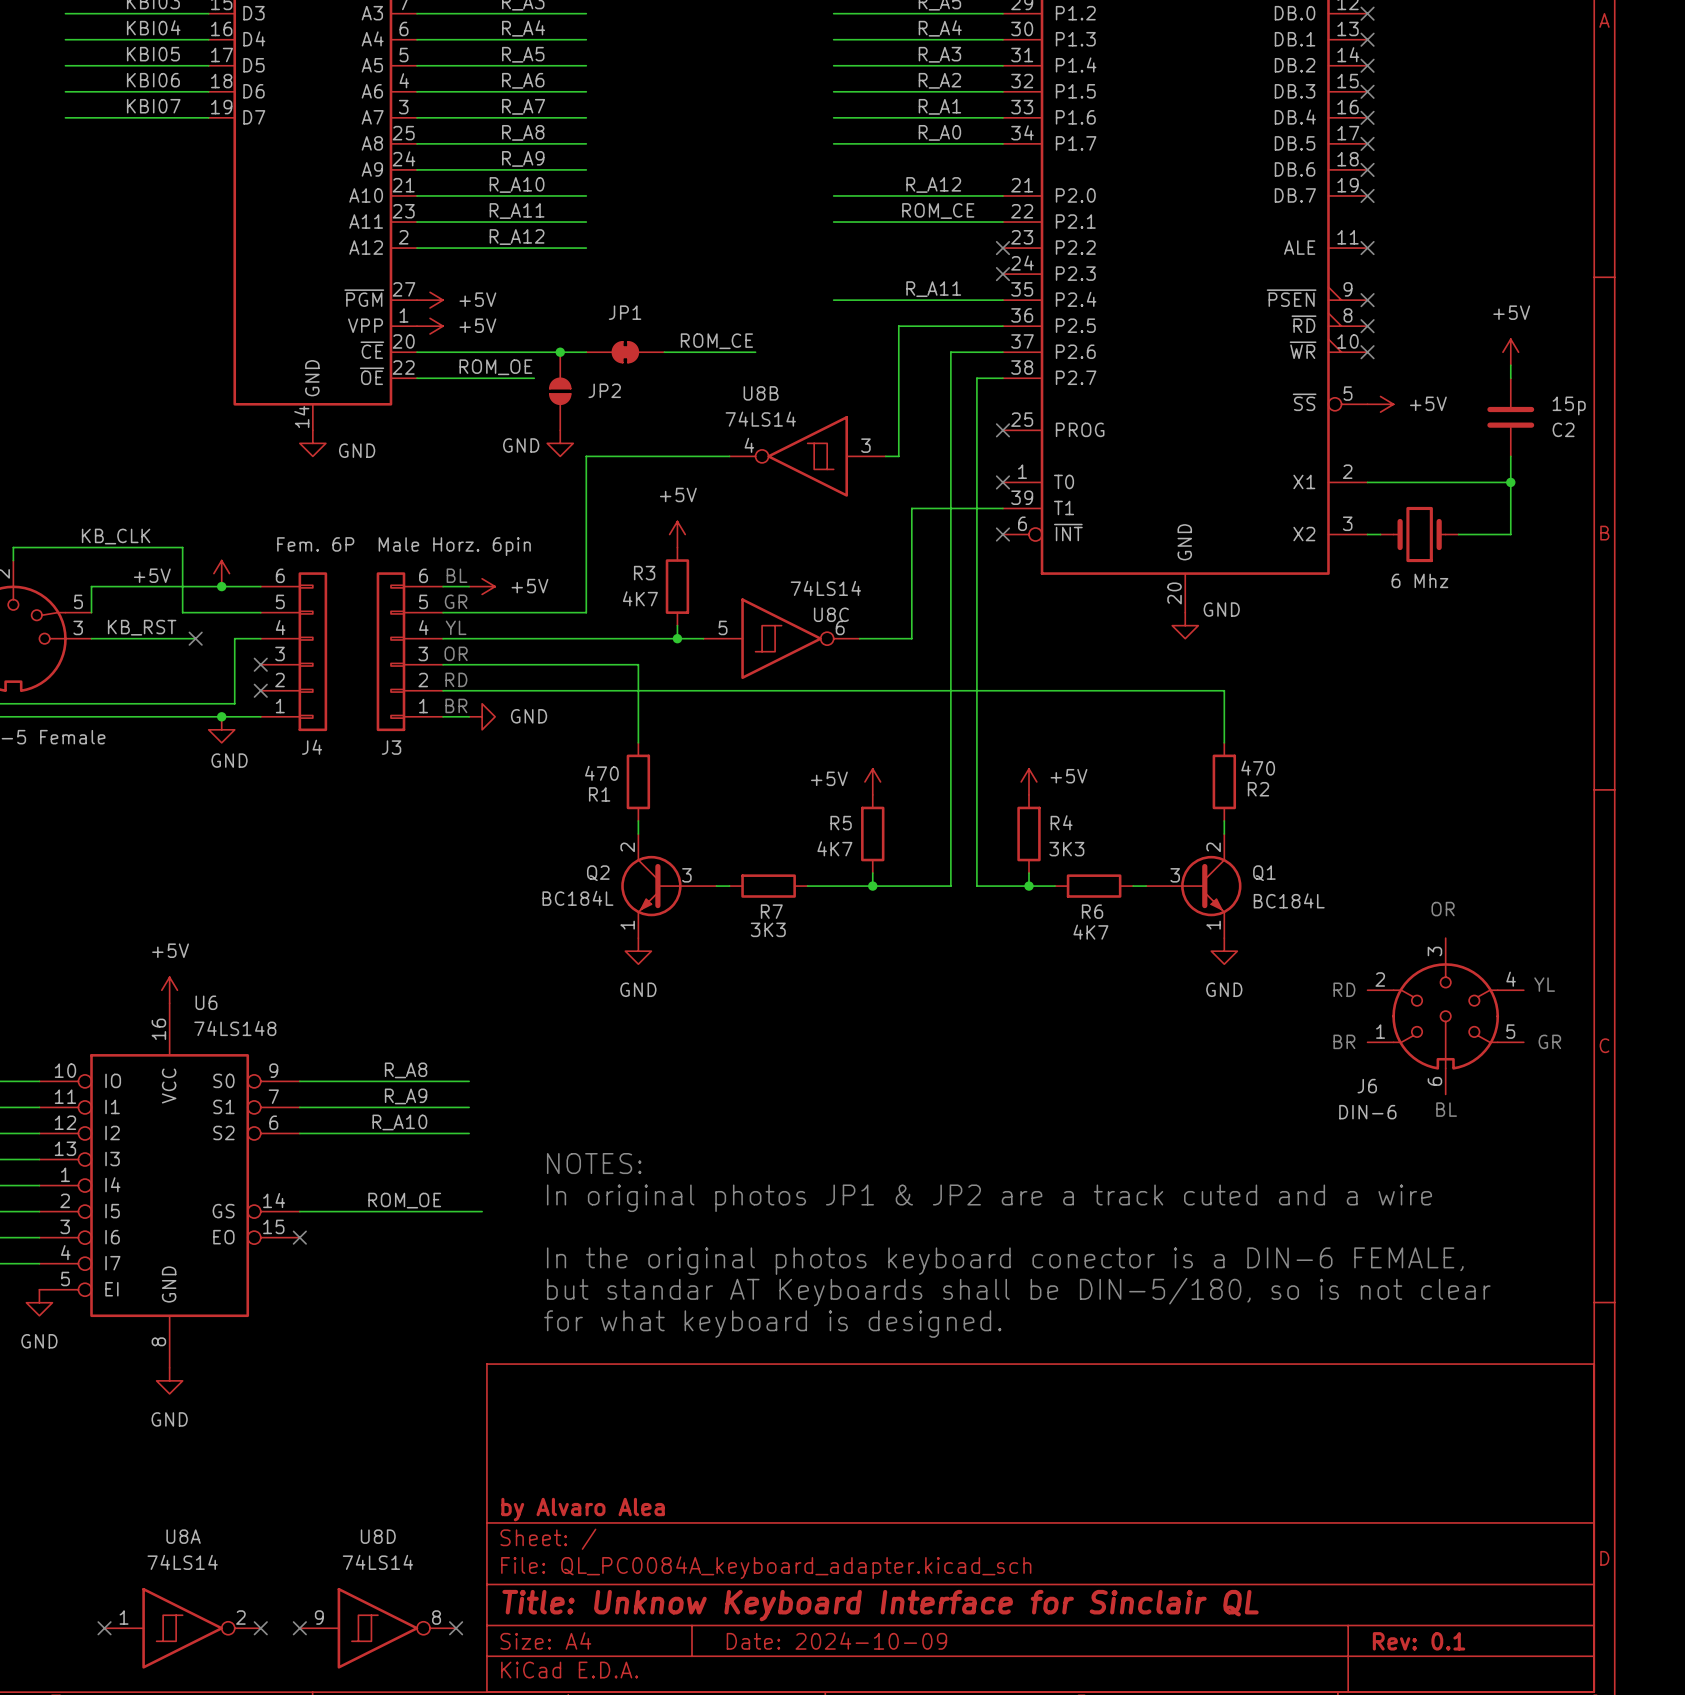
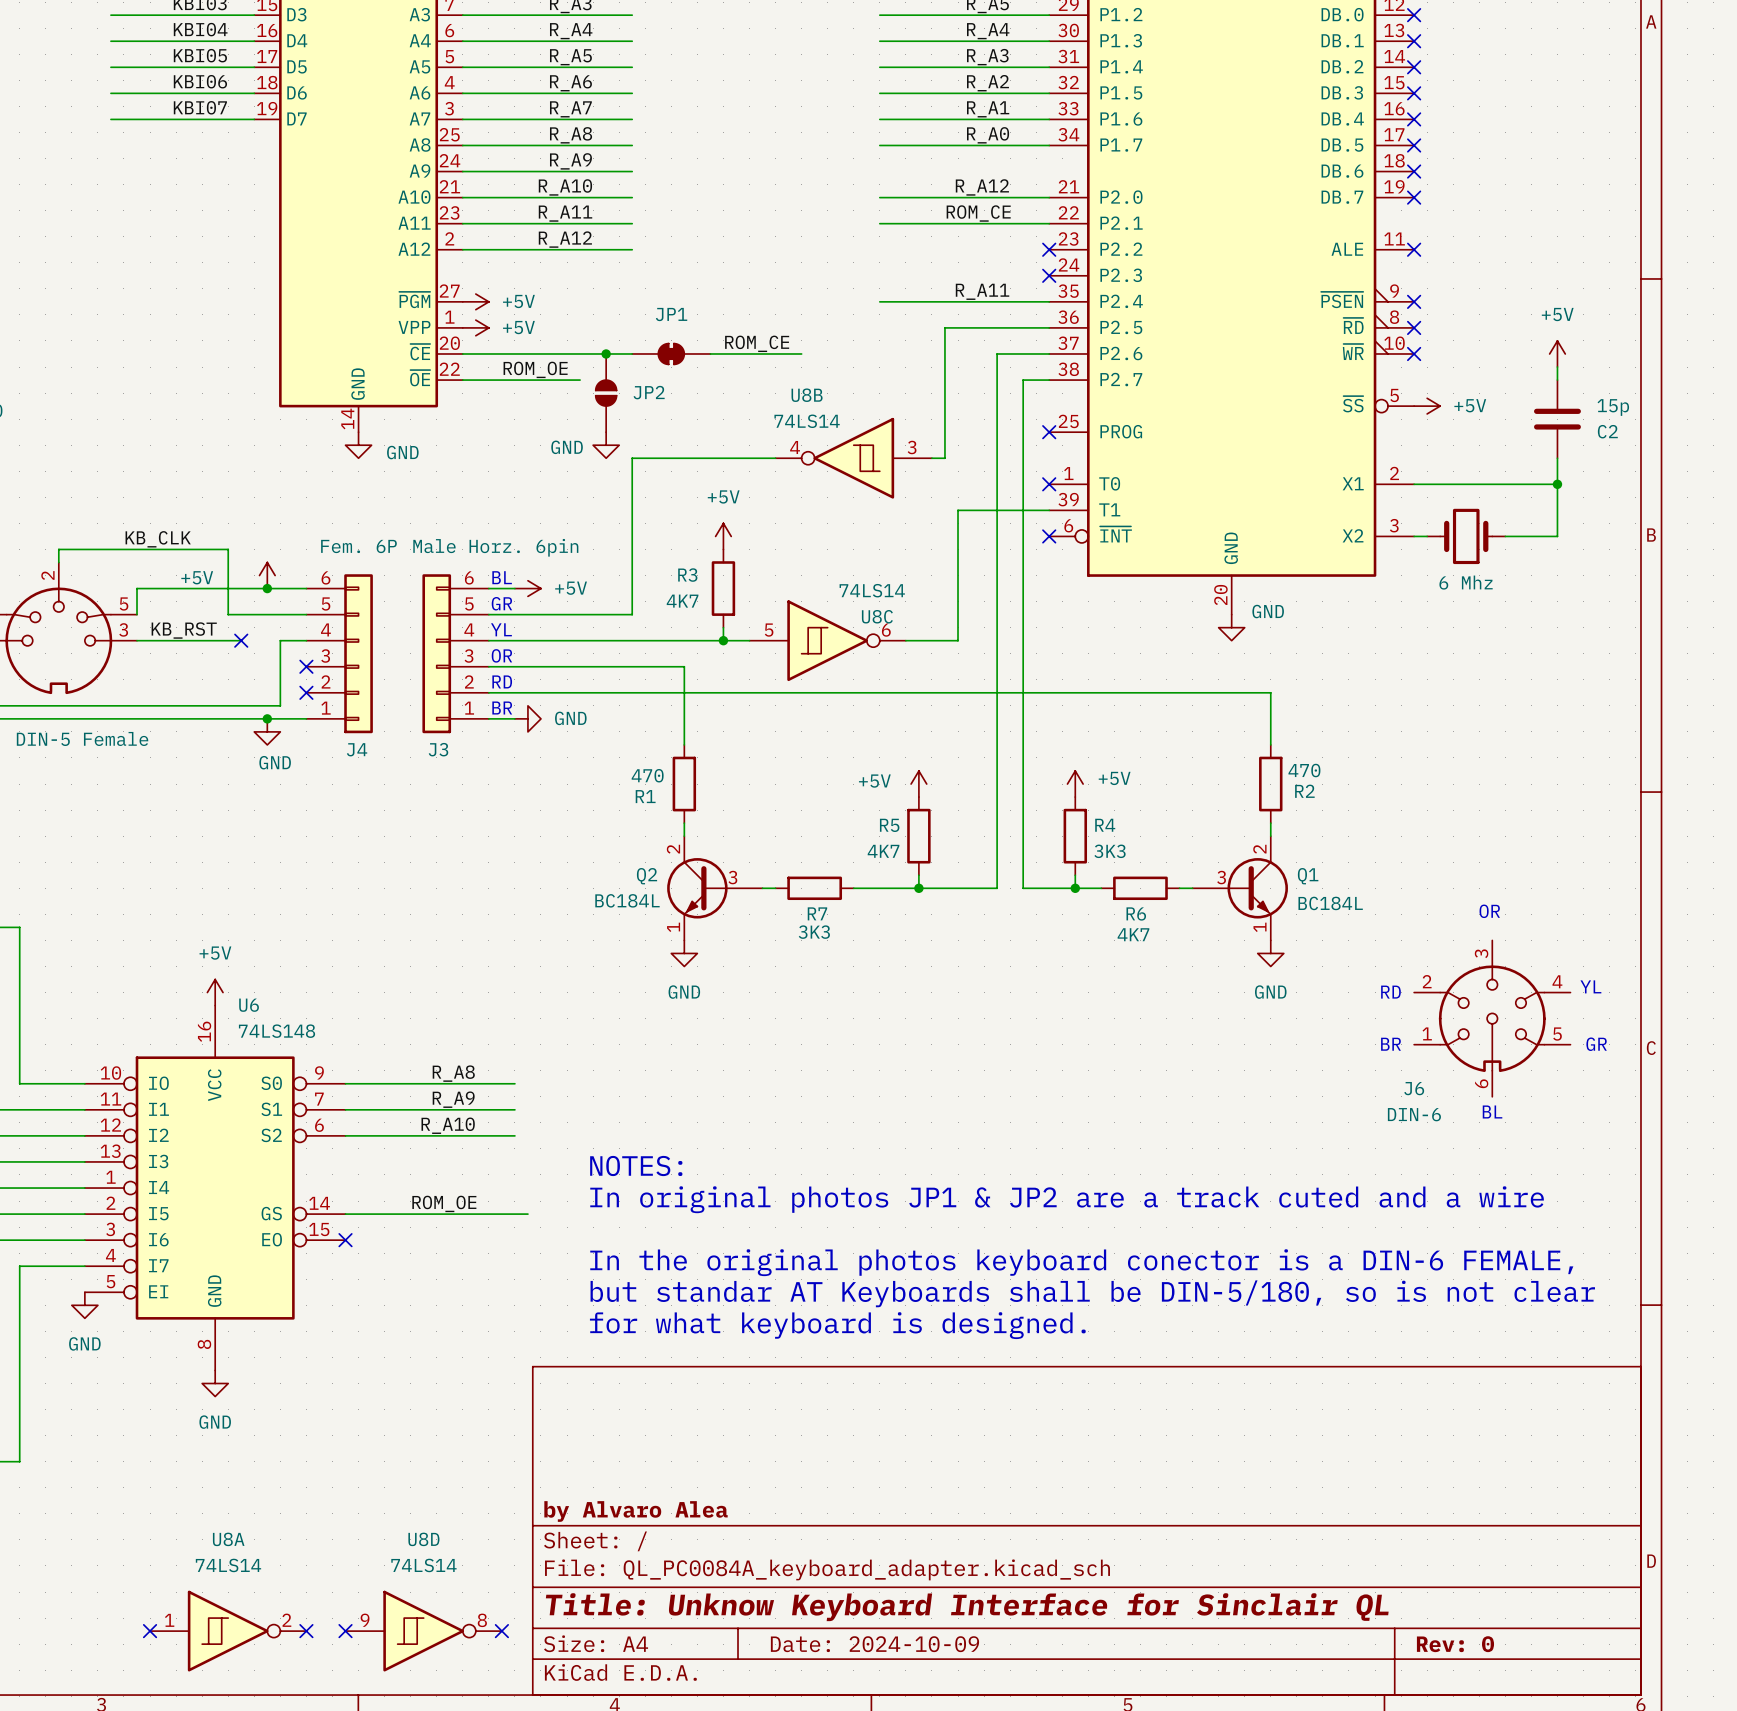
title block: Rev: 0.1 (1419, 1641) -> Rev: 0 (1455, 1644)

